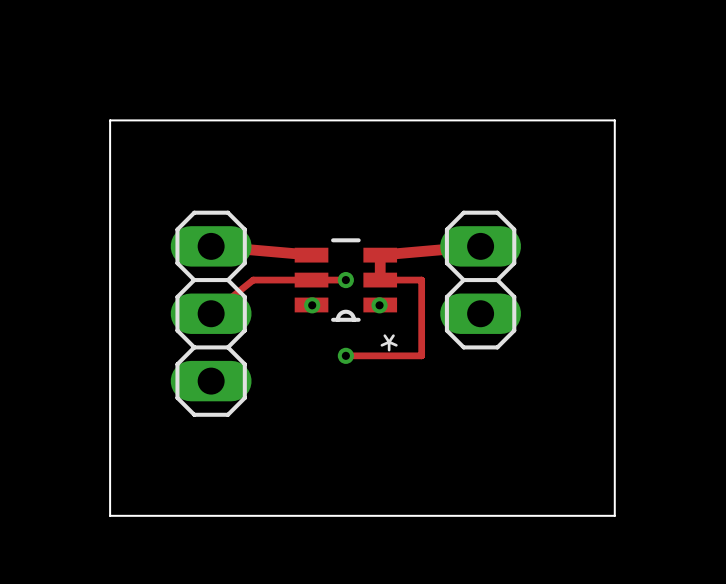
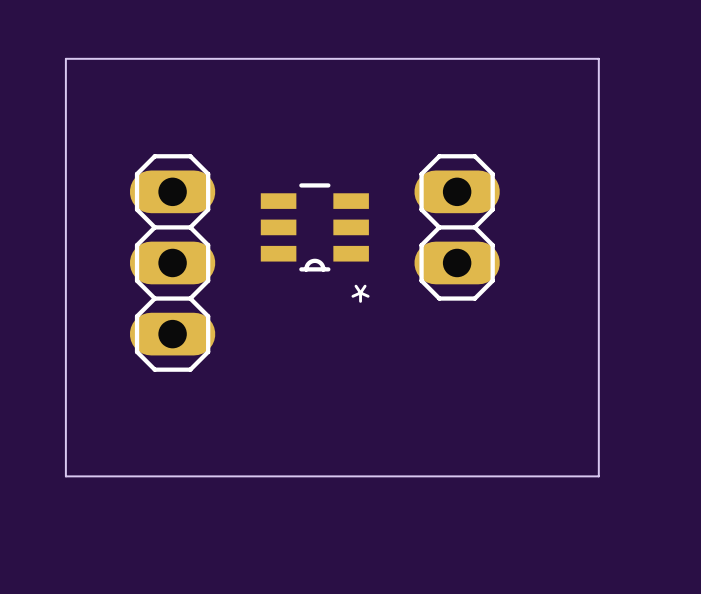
track: (211, 246) (311, 255) -> none
track: (480, 246) (380, 255) (380, 280) (421, 280) (421, 355) (345, 355) -> none
track: (345, 280) (253, 280) (211, 313) -> none
via: (345, 280) -> none
via: (312, 305) -> none
via: (379, 305) -> none
via: (345, 355) -> none

